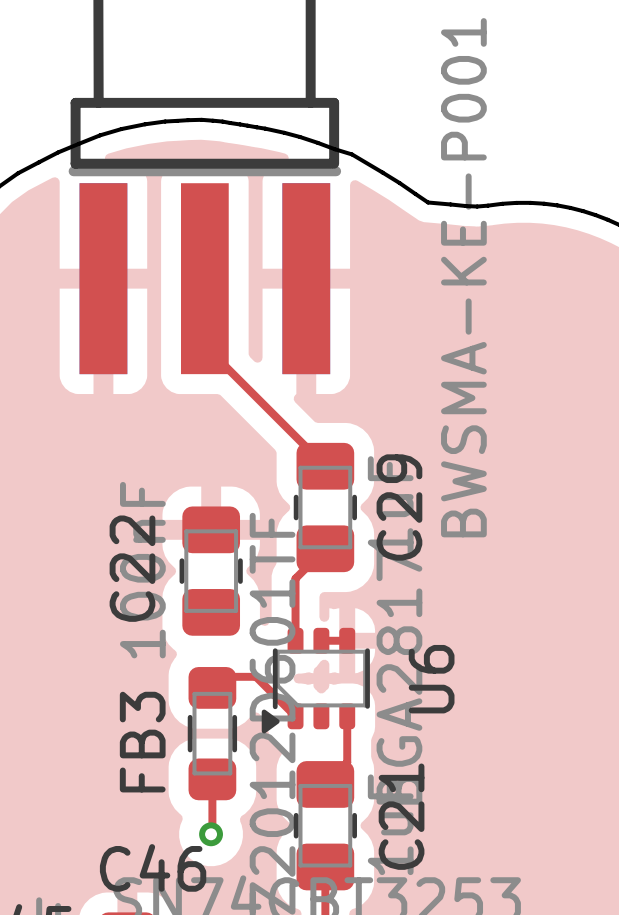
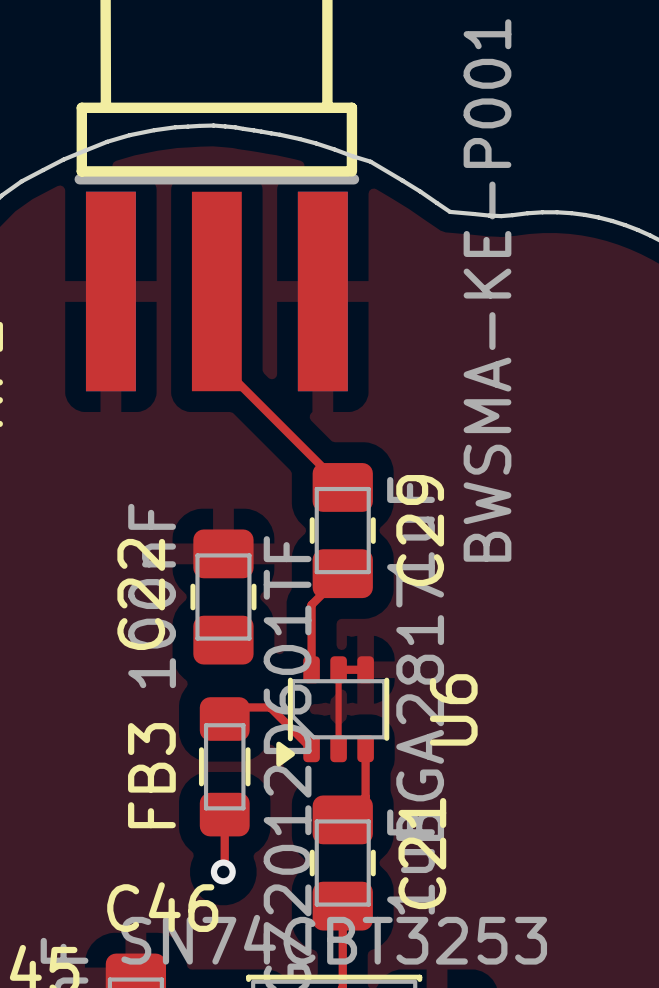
top track: none -> (338, 669) (338, 748)

